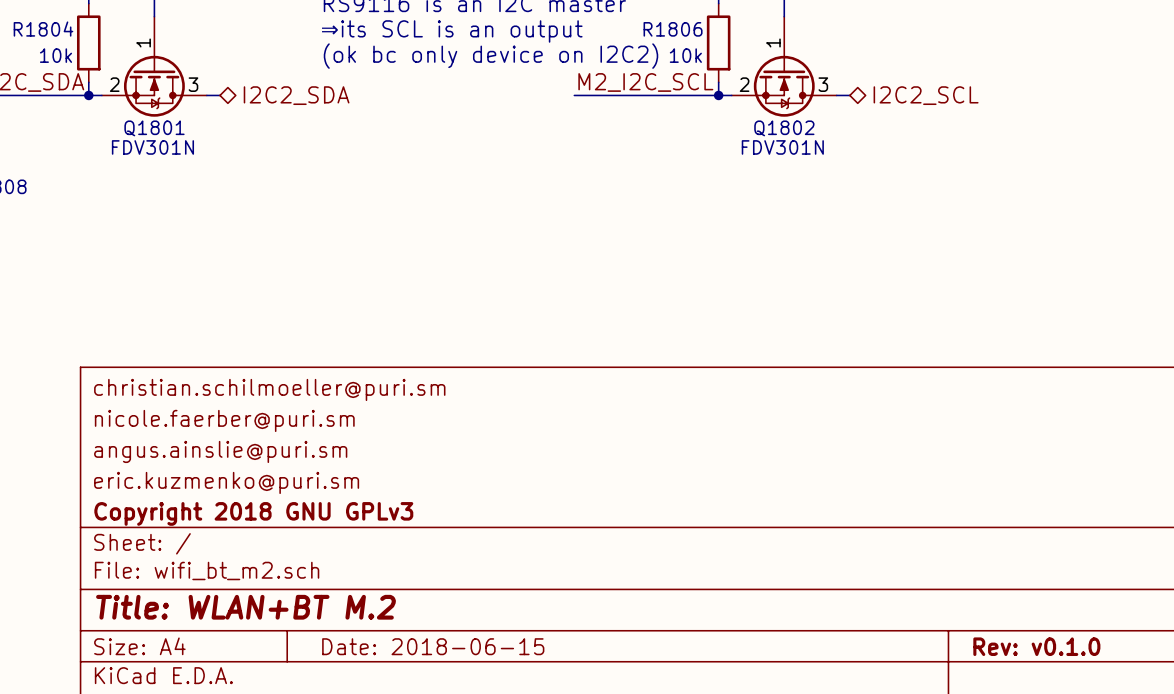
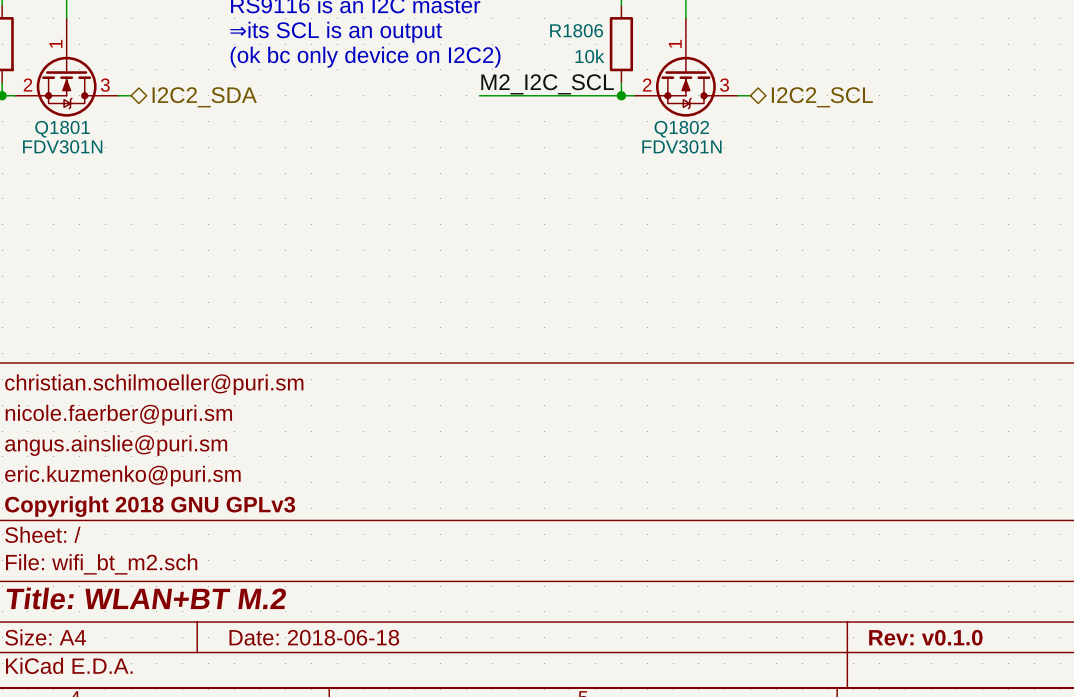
title block: Date: 2018-06-15 (433, 646) -> Date: 2018-06-18 (314, 637)

